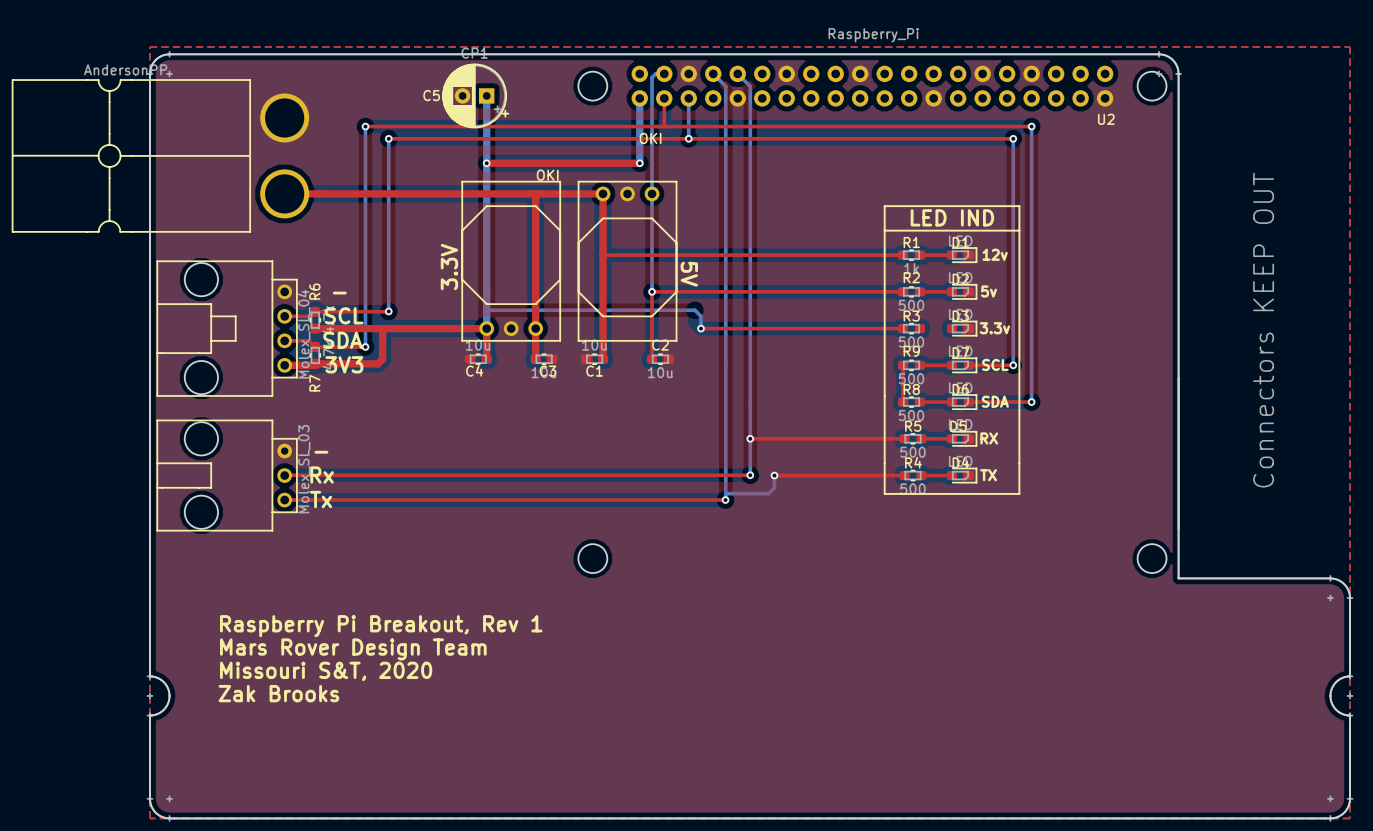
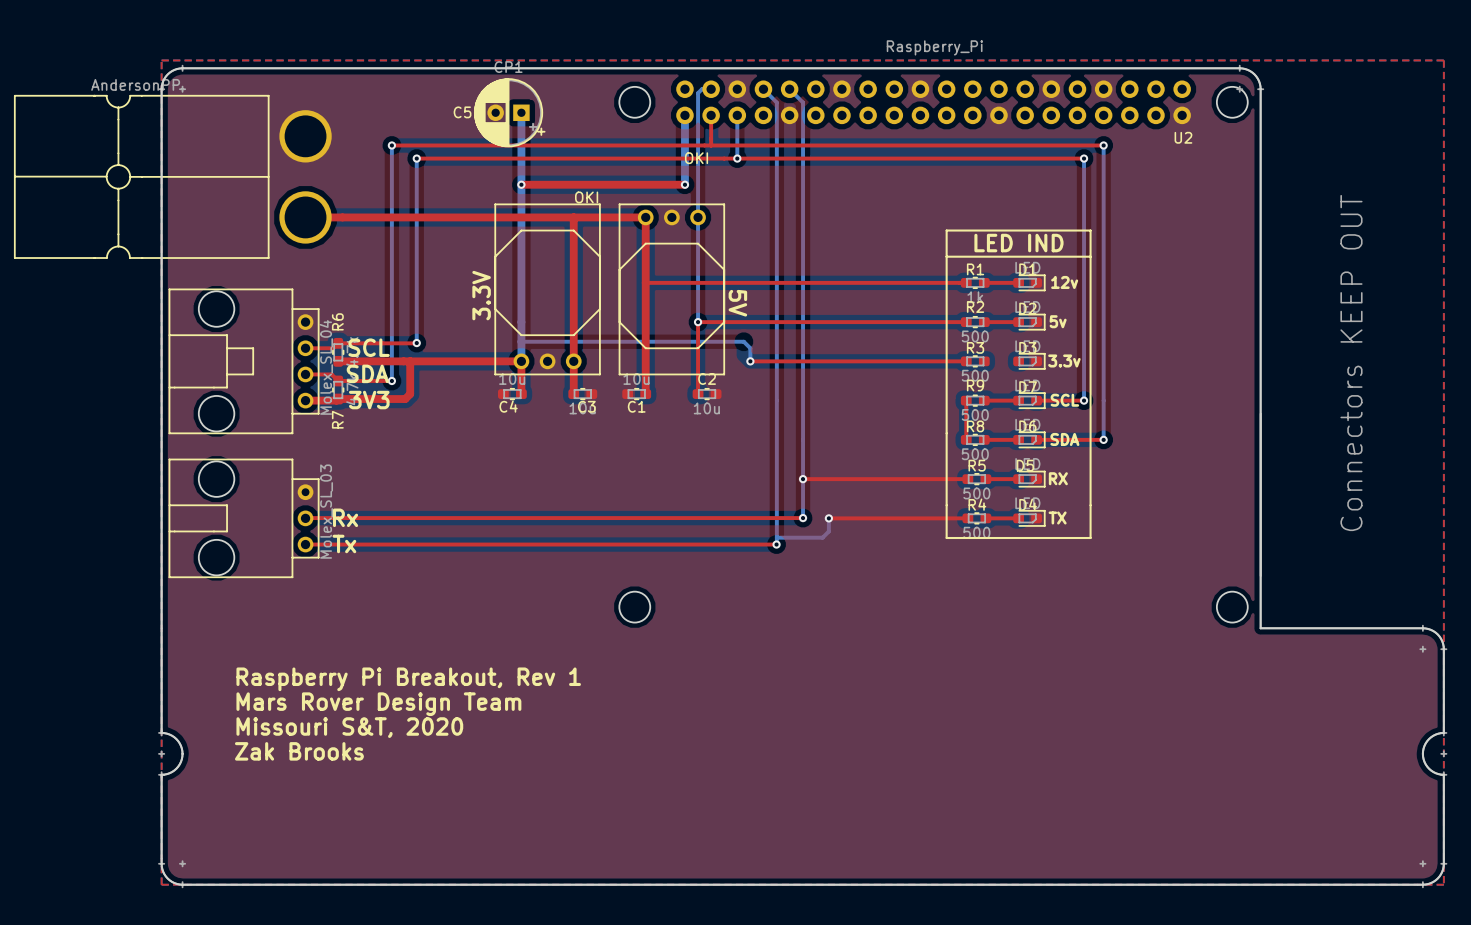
text: - (339, 293) -> none
text: - (321, 452) -> none

